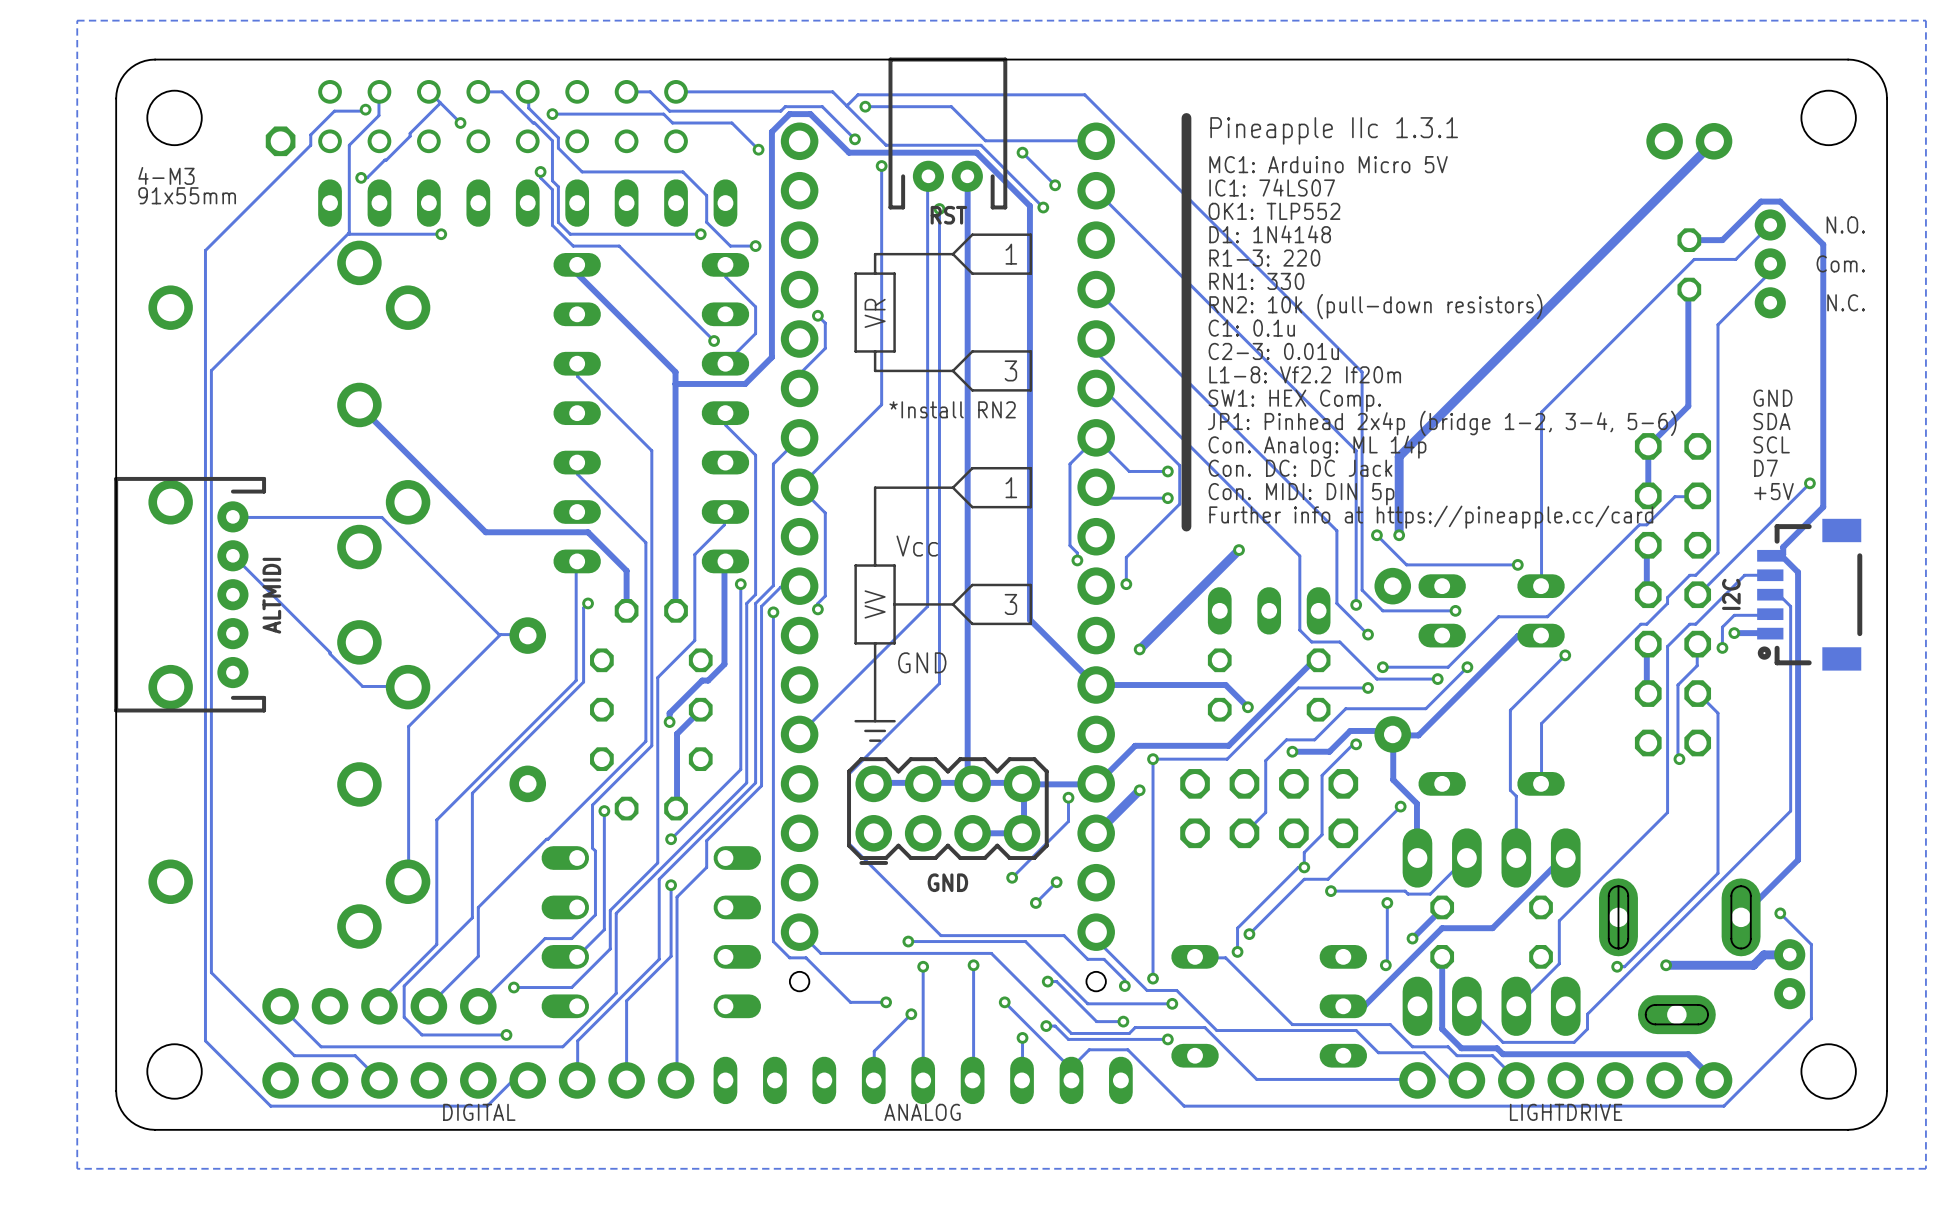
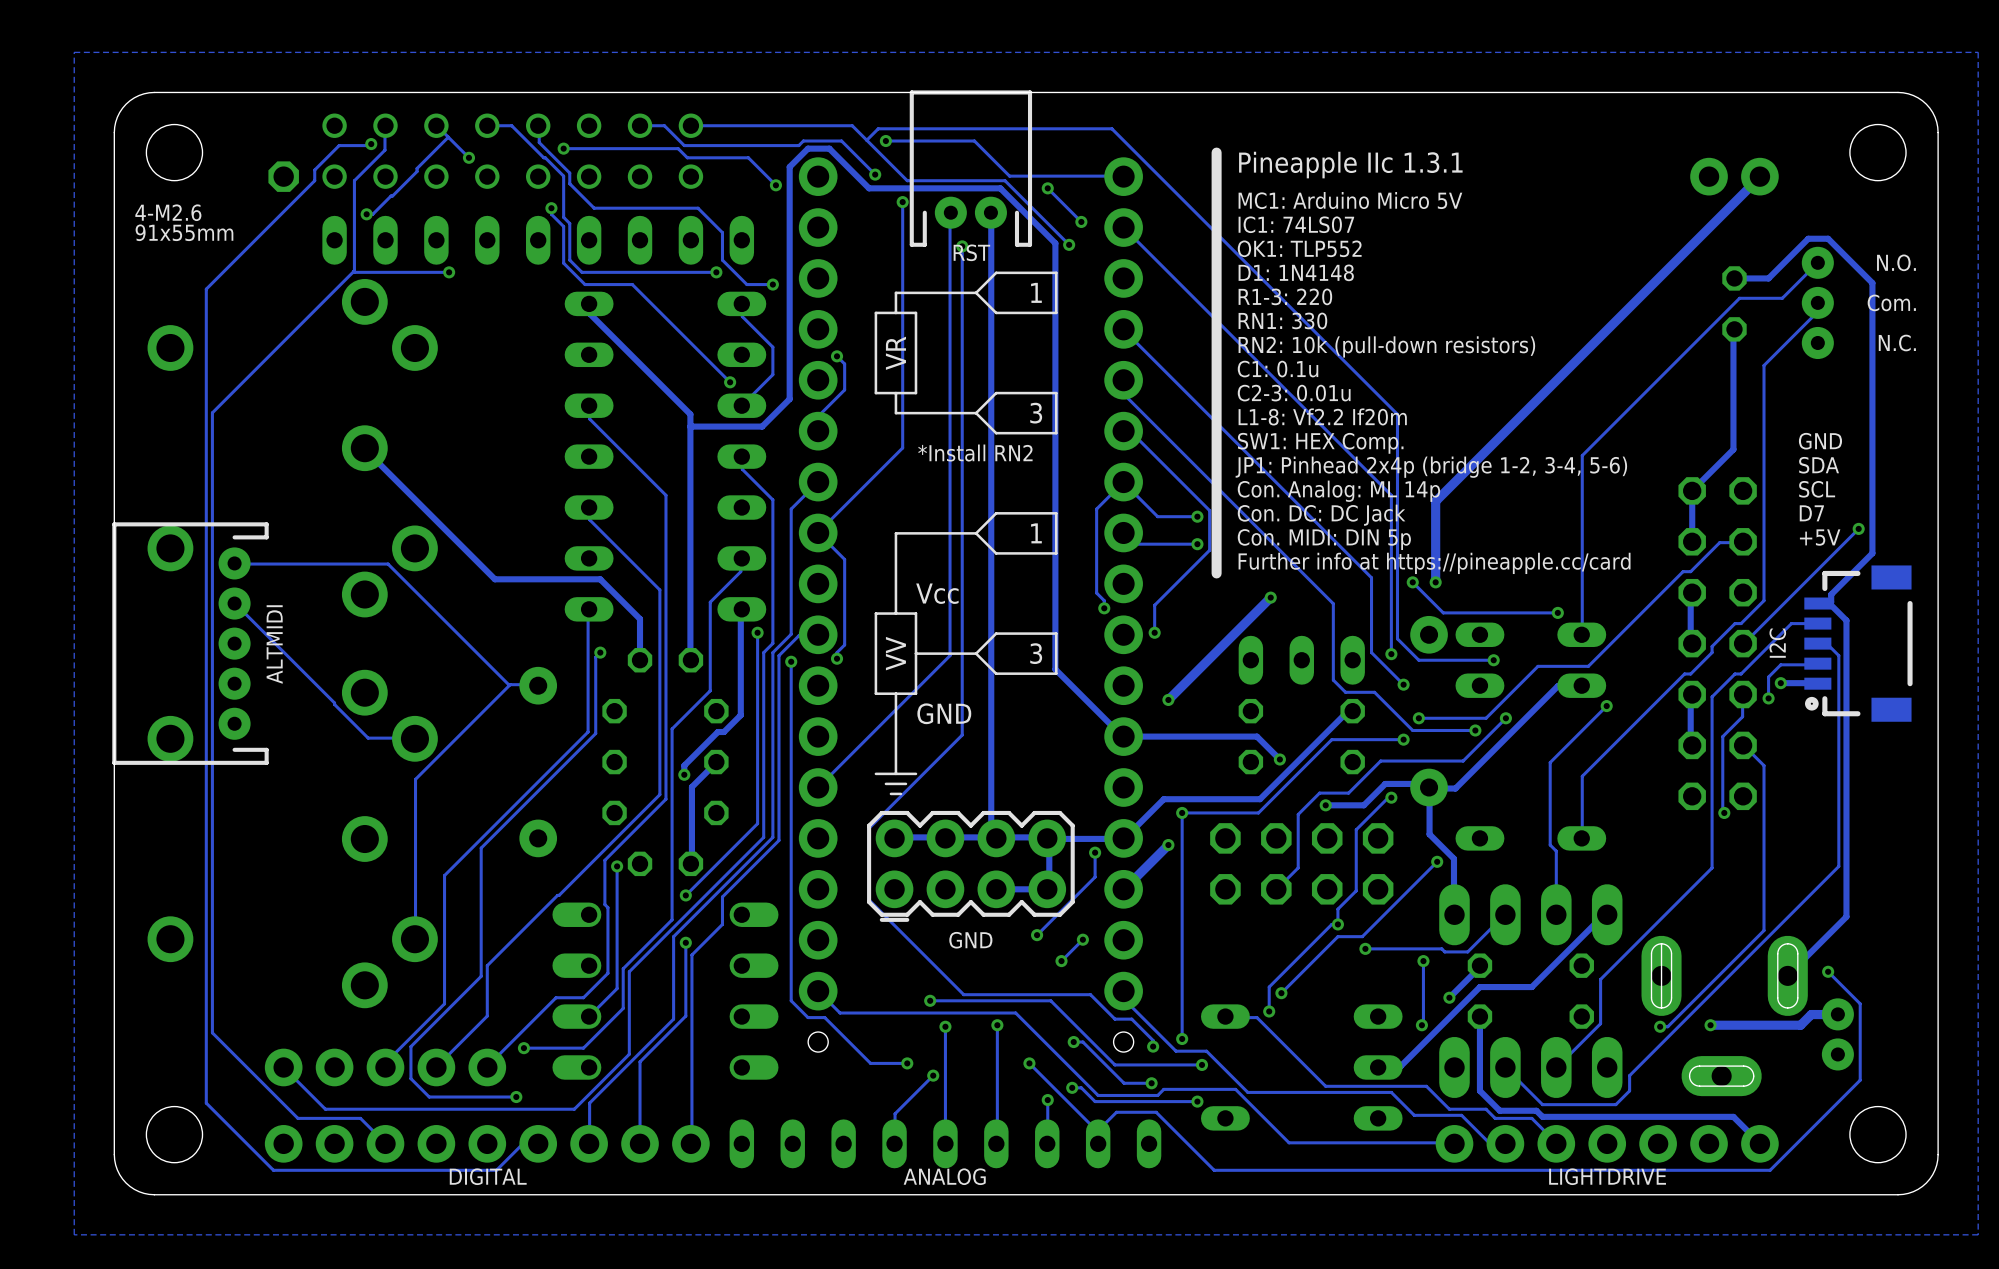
text: 4-M3 (166, 175) -> 4-M2.6 (168, 212)

